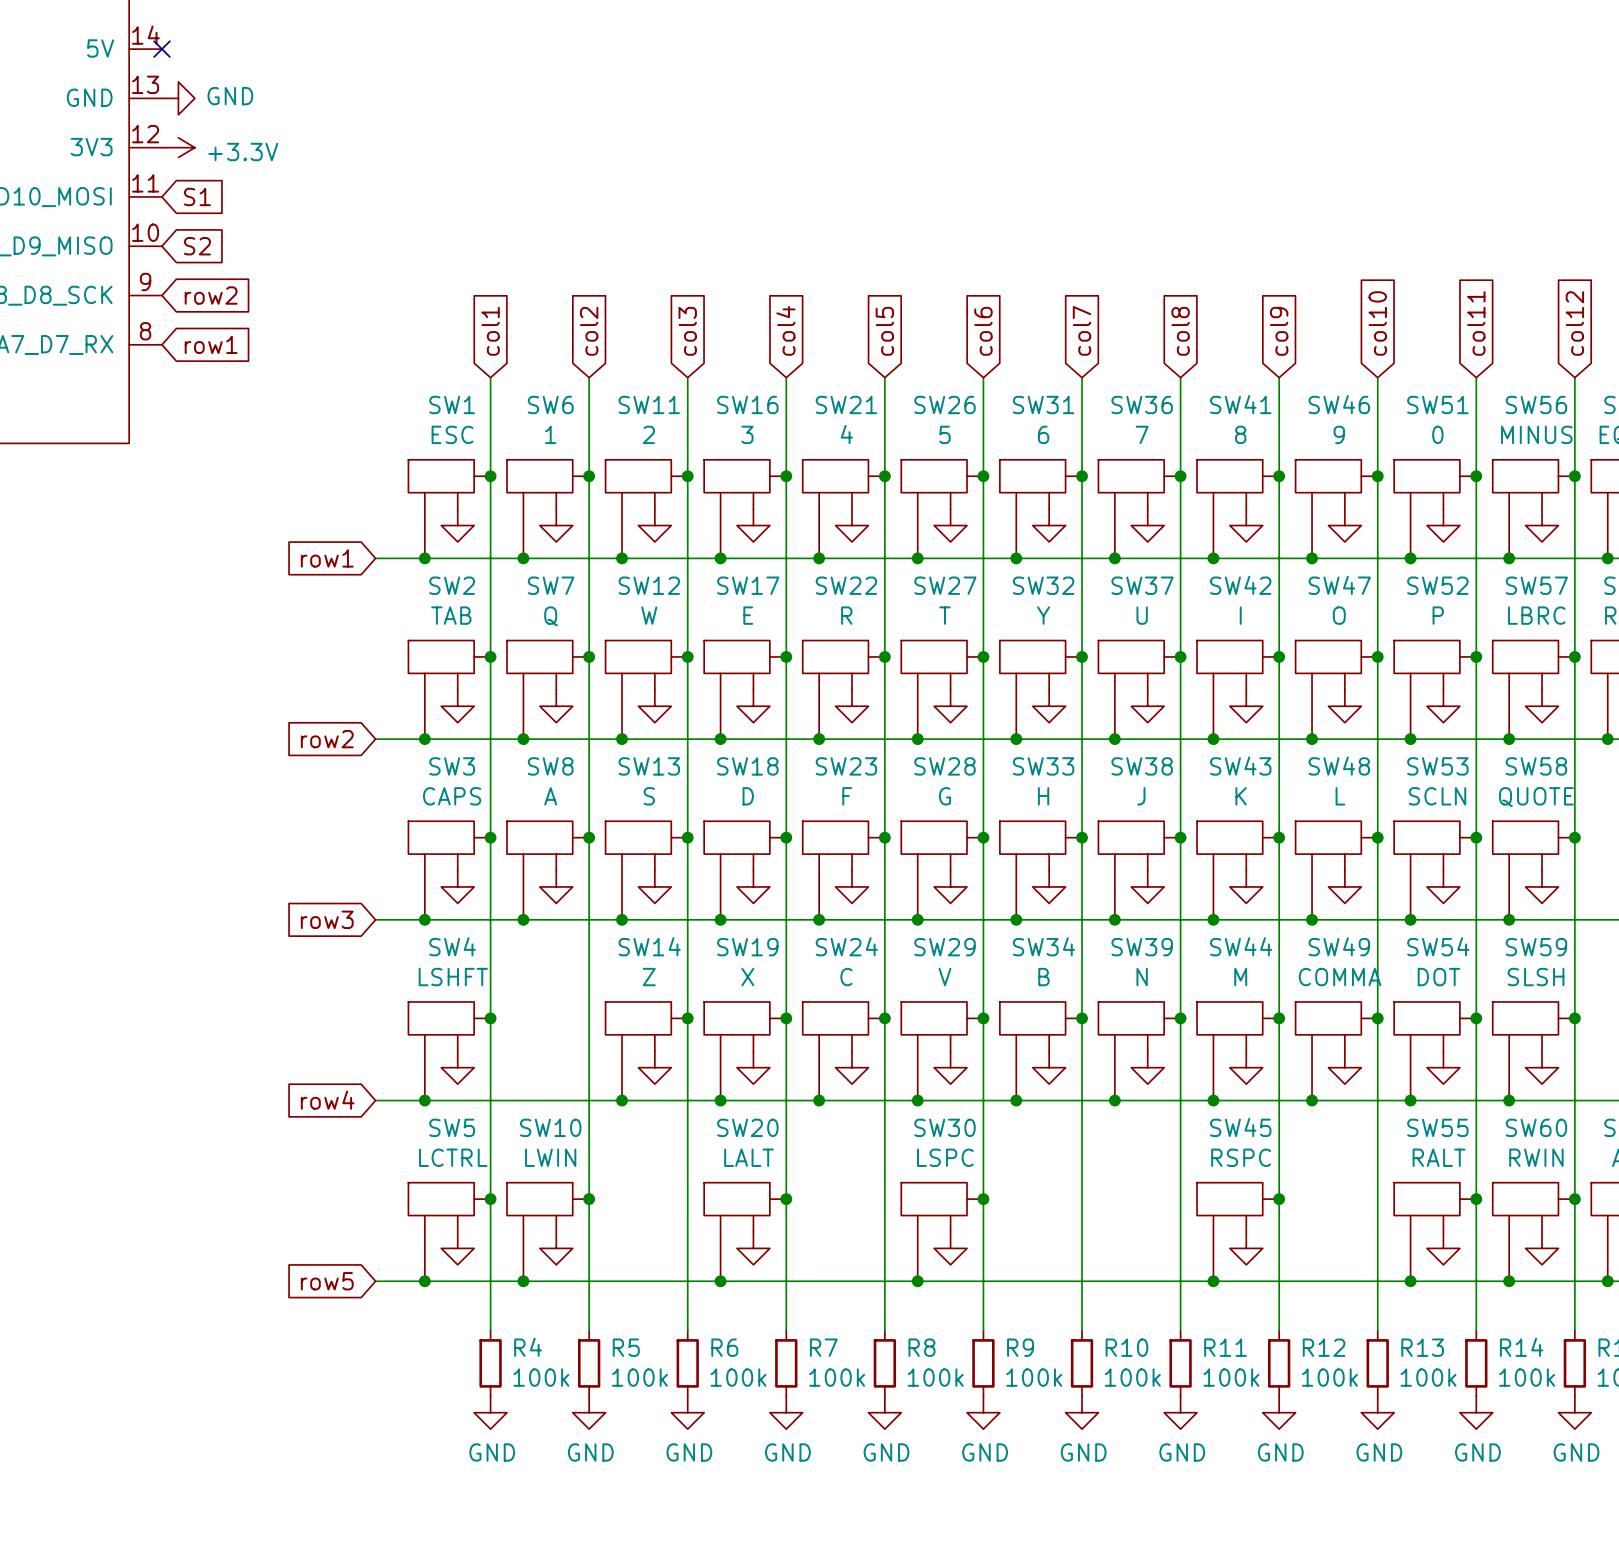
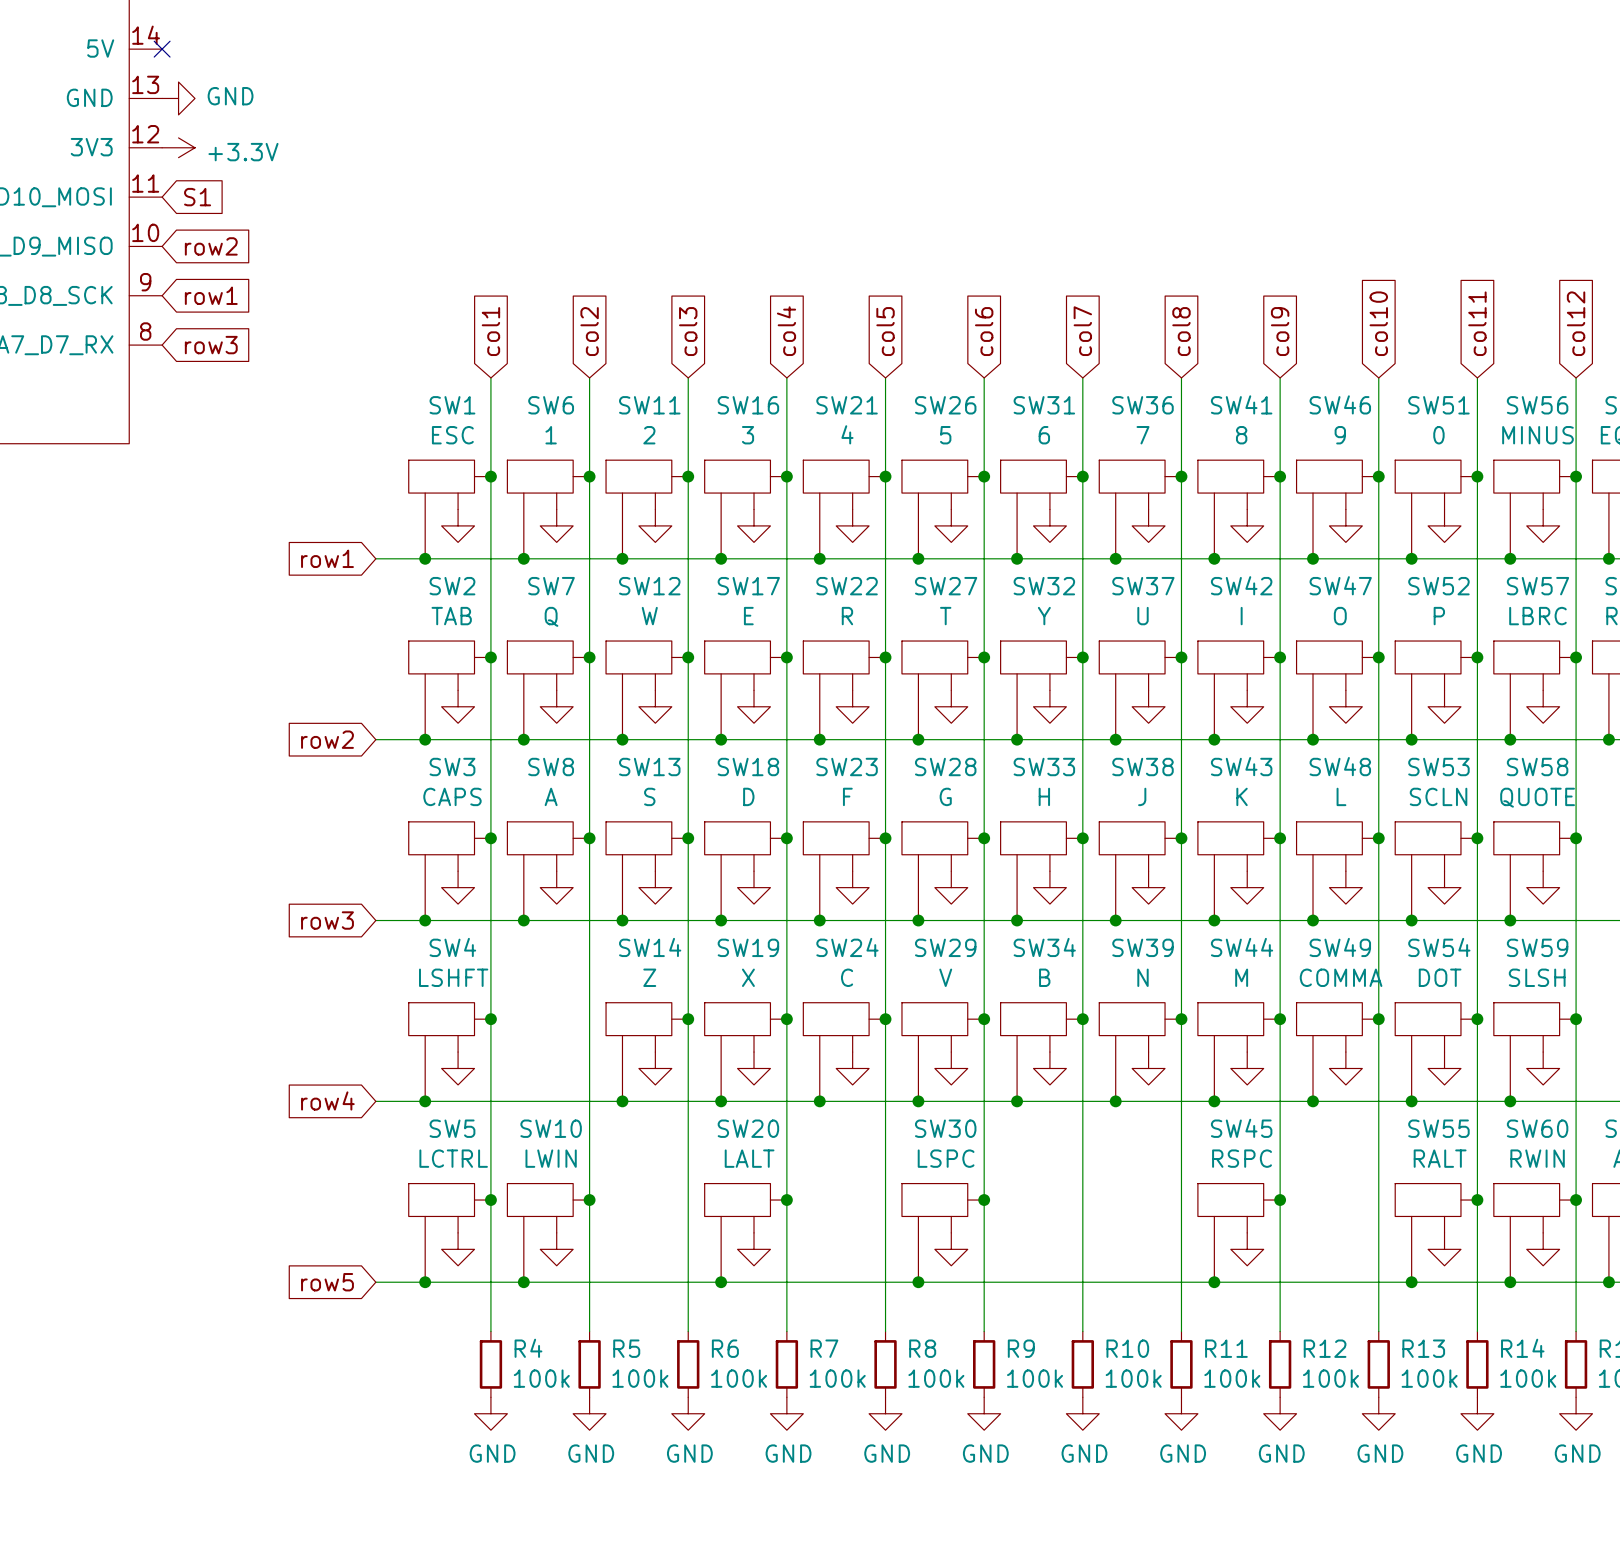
global label: S2 (197, 246) -> row2 (211, 246)
global label: row2 (211, 295) -> row1 (211, 295)
global label: row1 (211, 344) -> row3 (211, 345)

